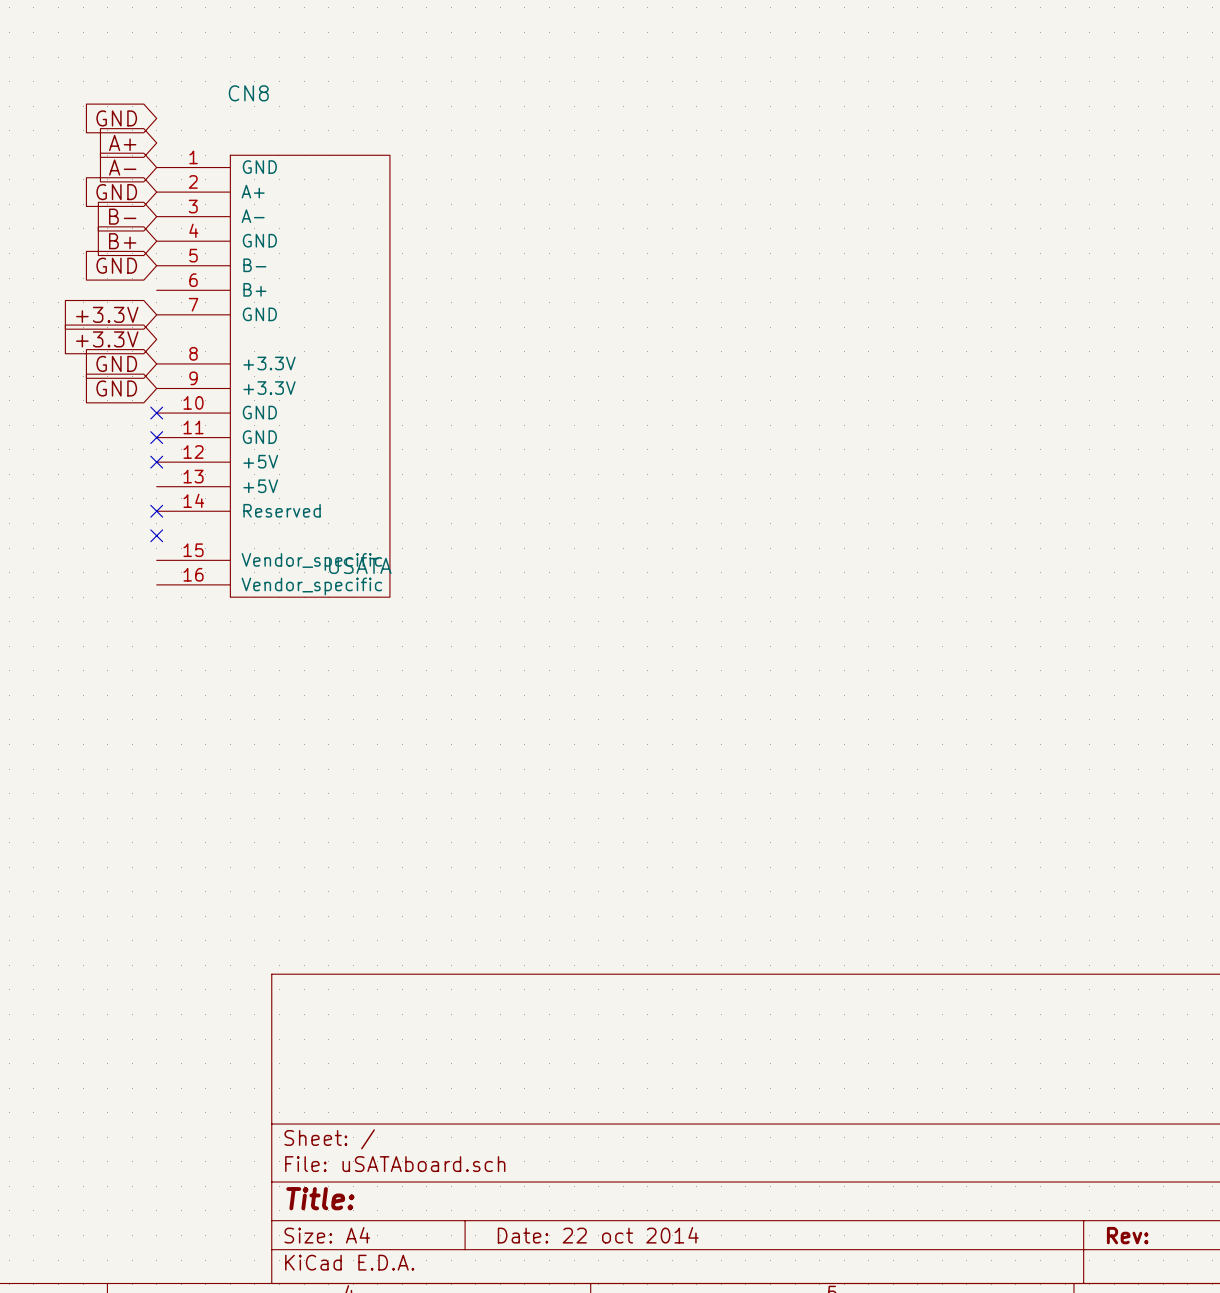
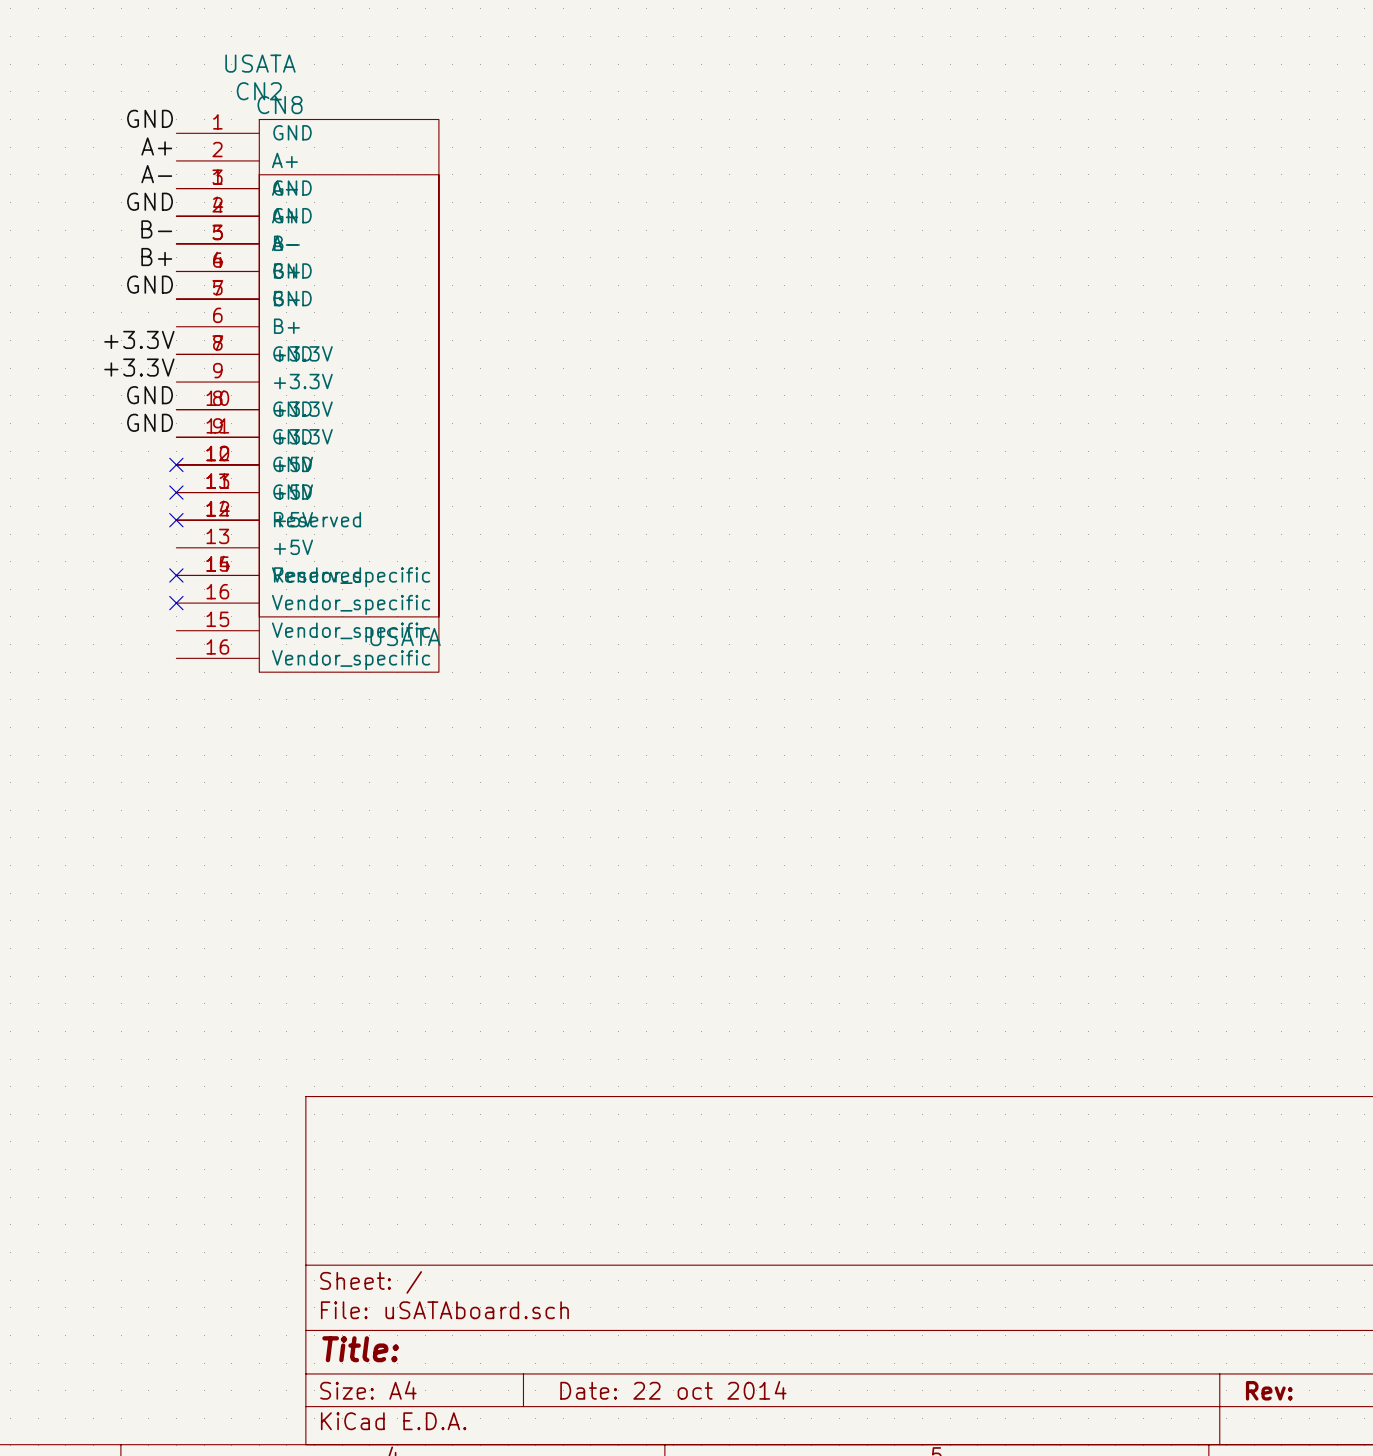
label: none -> GND (150, 118)
global label: GND (116, 118) -> none
label: none -> A+ (156, 146)
global label: A+ (122, 142) -> none
label: none -> A- (156, 174)
global label: A- (122, 167) -> none
label: none -> GND (150, 201)
global label: GND (116, 192) -> none
label: none -> B- (156, 229)
global label: B- (122, 216) -> none
label: none -> B+ (156, 257)
global label: B+ (122, 241) -> none
label: none -> GND (150, 284)
global label: GND (116, 265) -> none
label: none -> +3.3V (139, 339)
global label: +3.3V (107, 314) -> none
label: none -> +3.3V (139, 367)
CN2: none -> USATA (307, 368)
global label: +3.3V (107, 339) -> none
label: none -> GND (150, 395)
global label: GND (116, 363) -> none
label: none -> GND (150, 422)
global label: GND (116, 388) -> none

